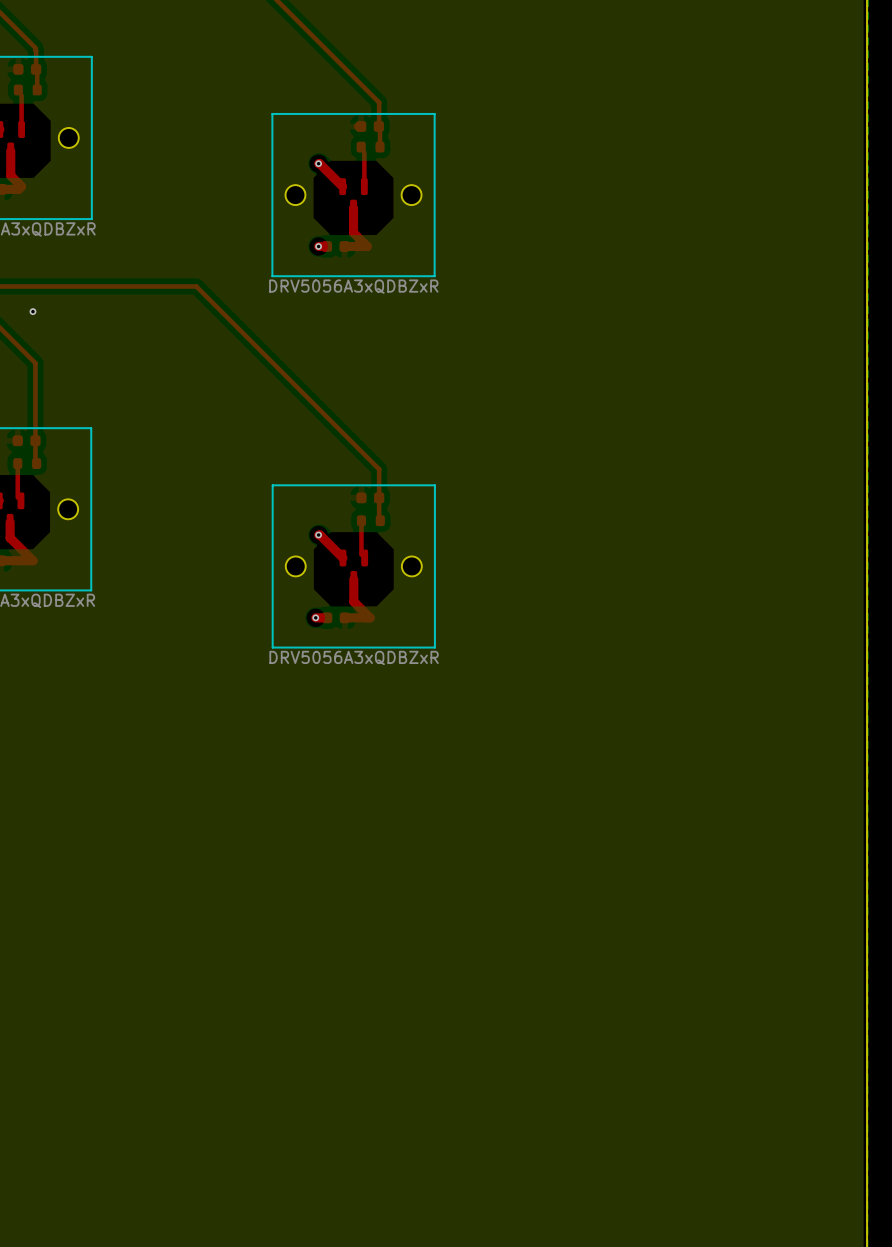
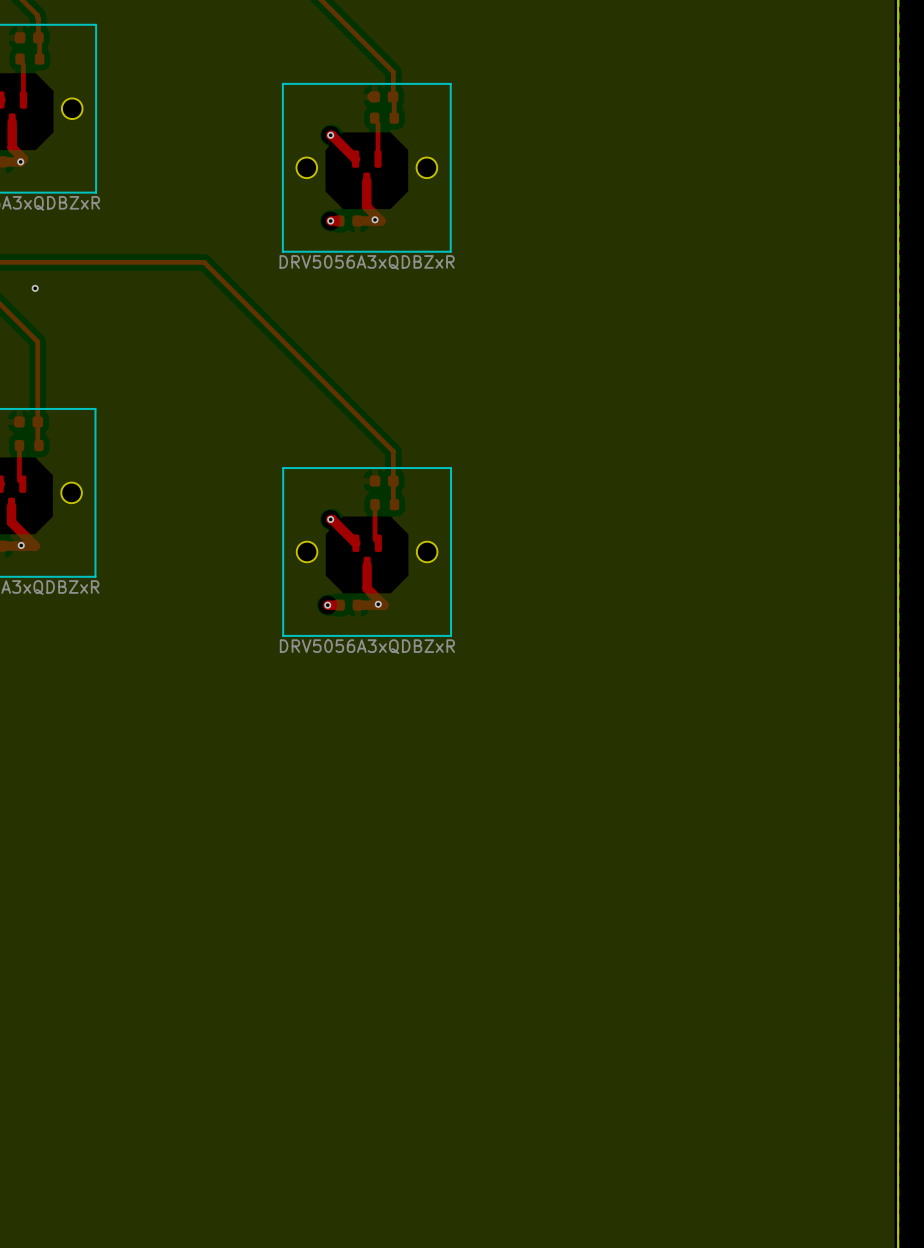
via: none -> (20, 161)
via: none -> (375, 219)
via: none -> (21, 545)
via: none -> (378, 604)

